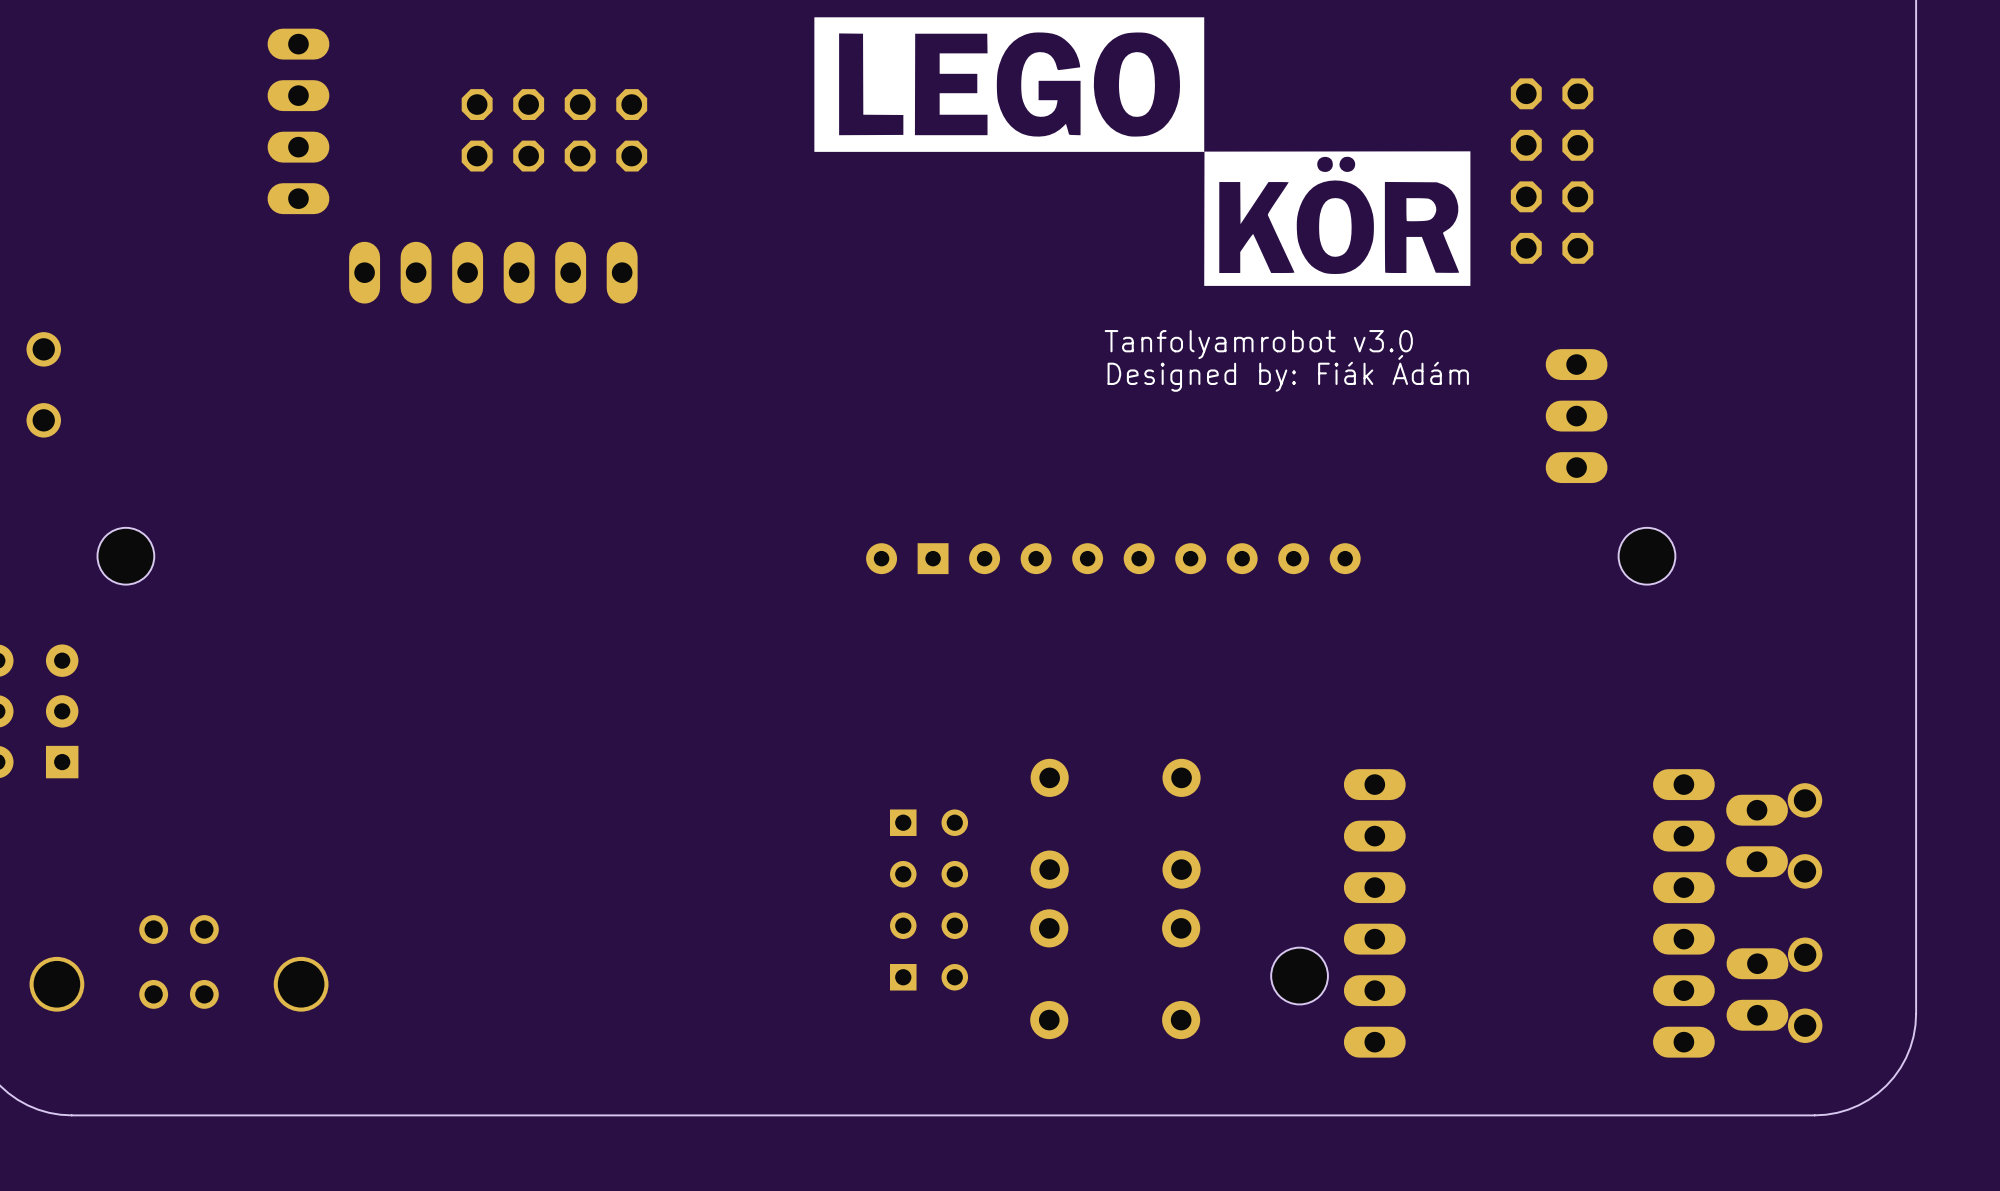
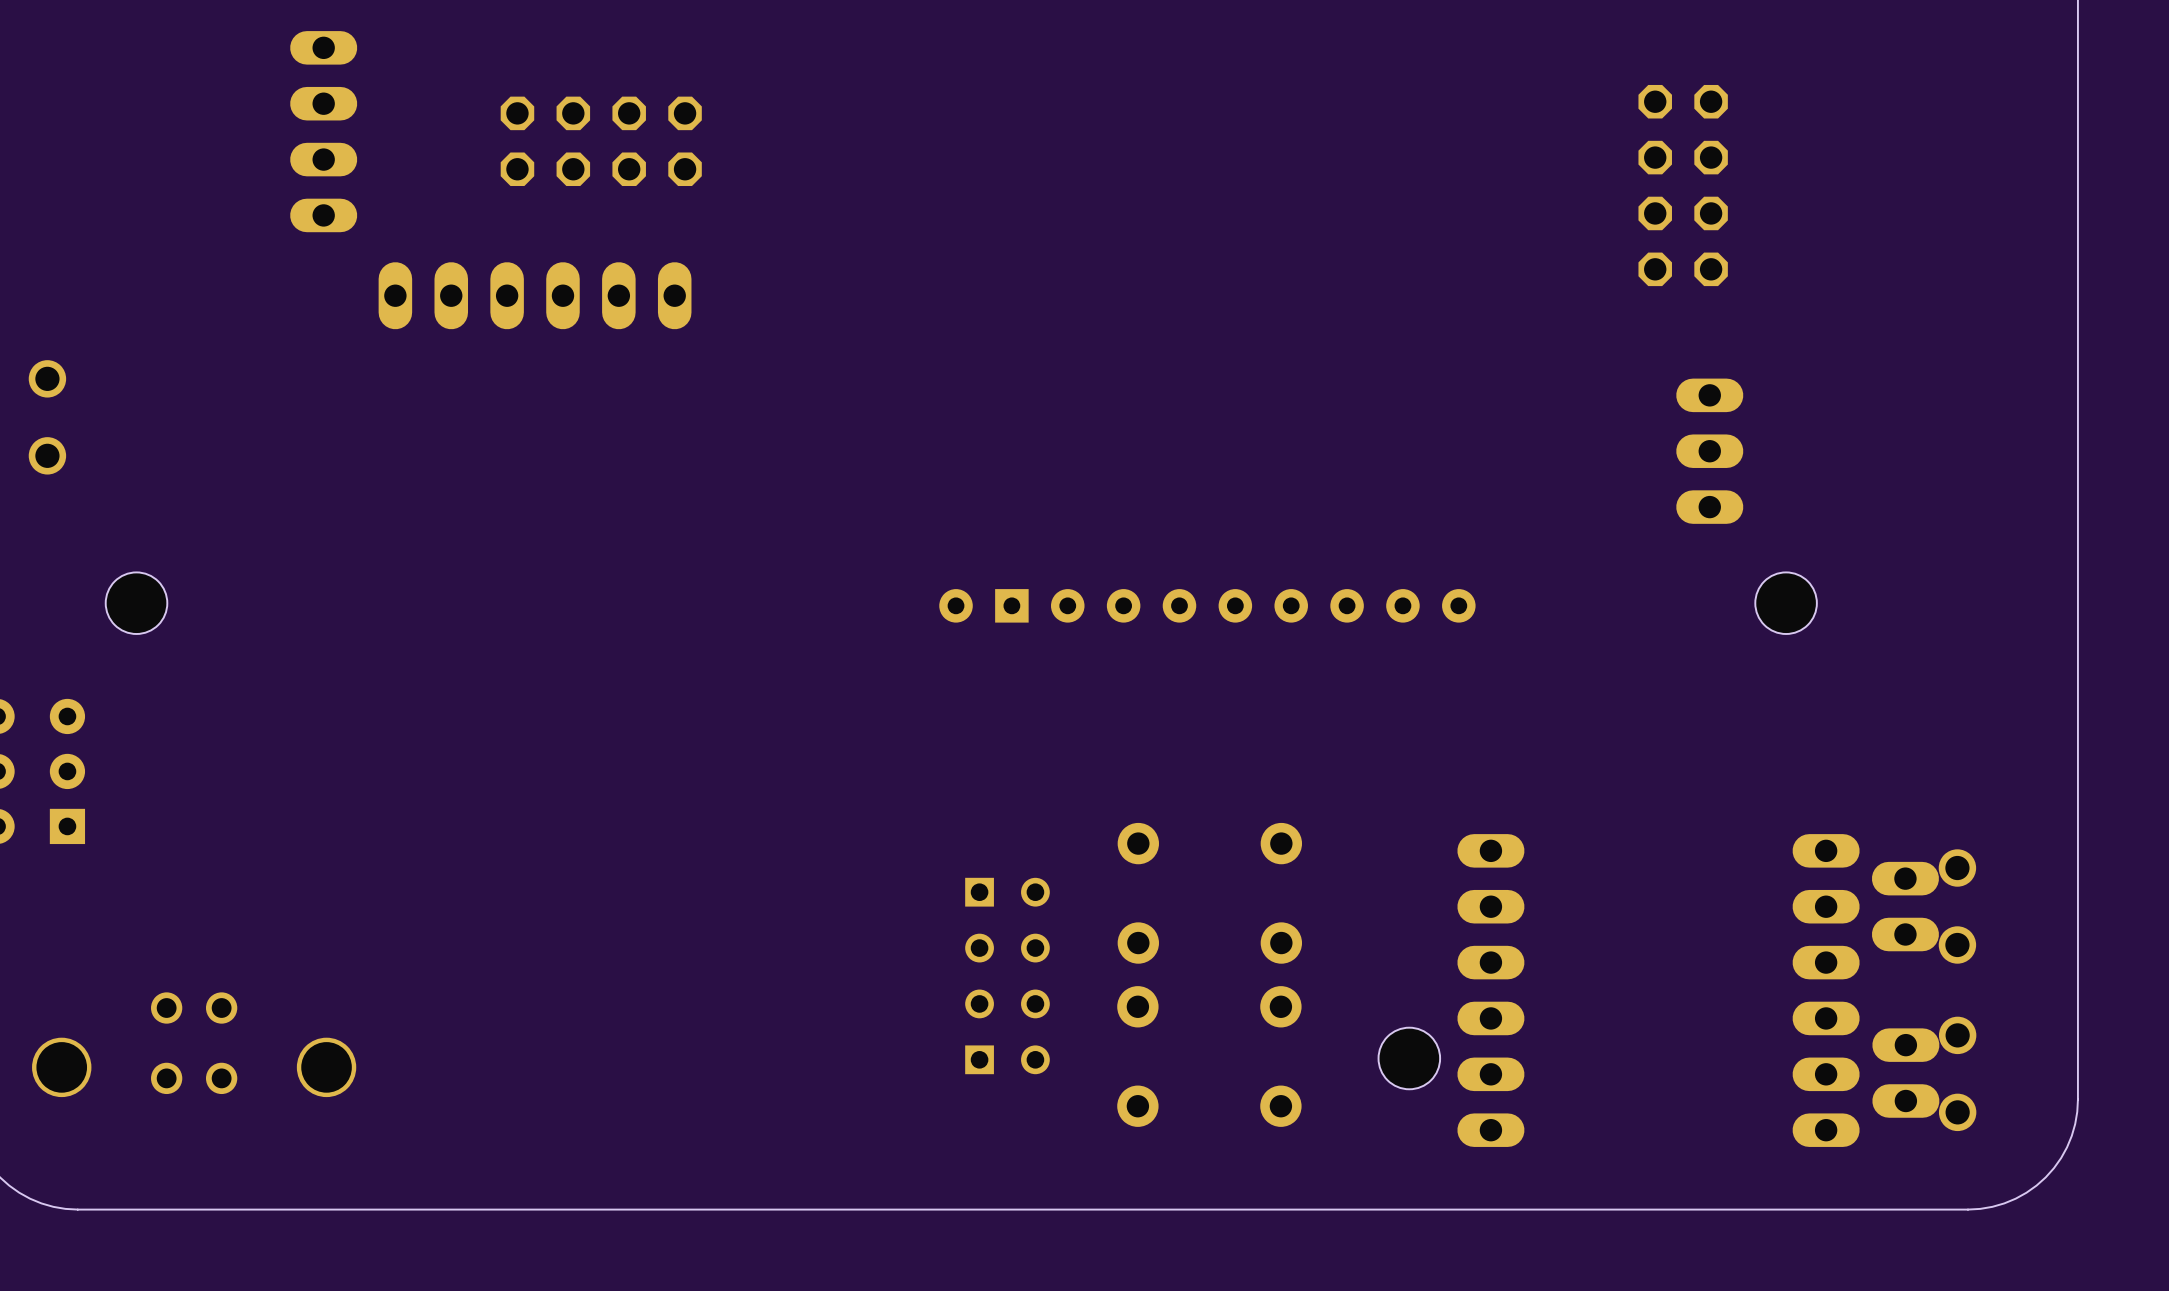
drawing: [814, 17, 1471, 286] -> none
text: Tanfolyamrobot v3.0 (1258, 344) -> none
text: Designed by: Fiák Ádám (1288, 373) -> none

